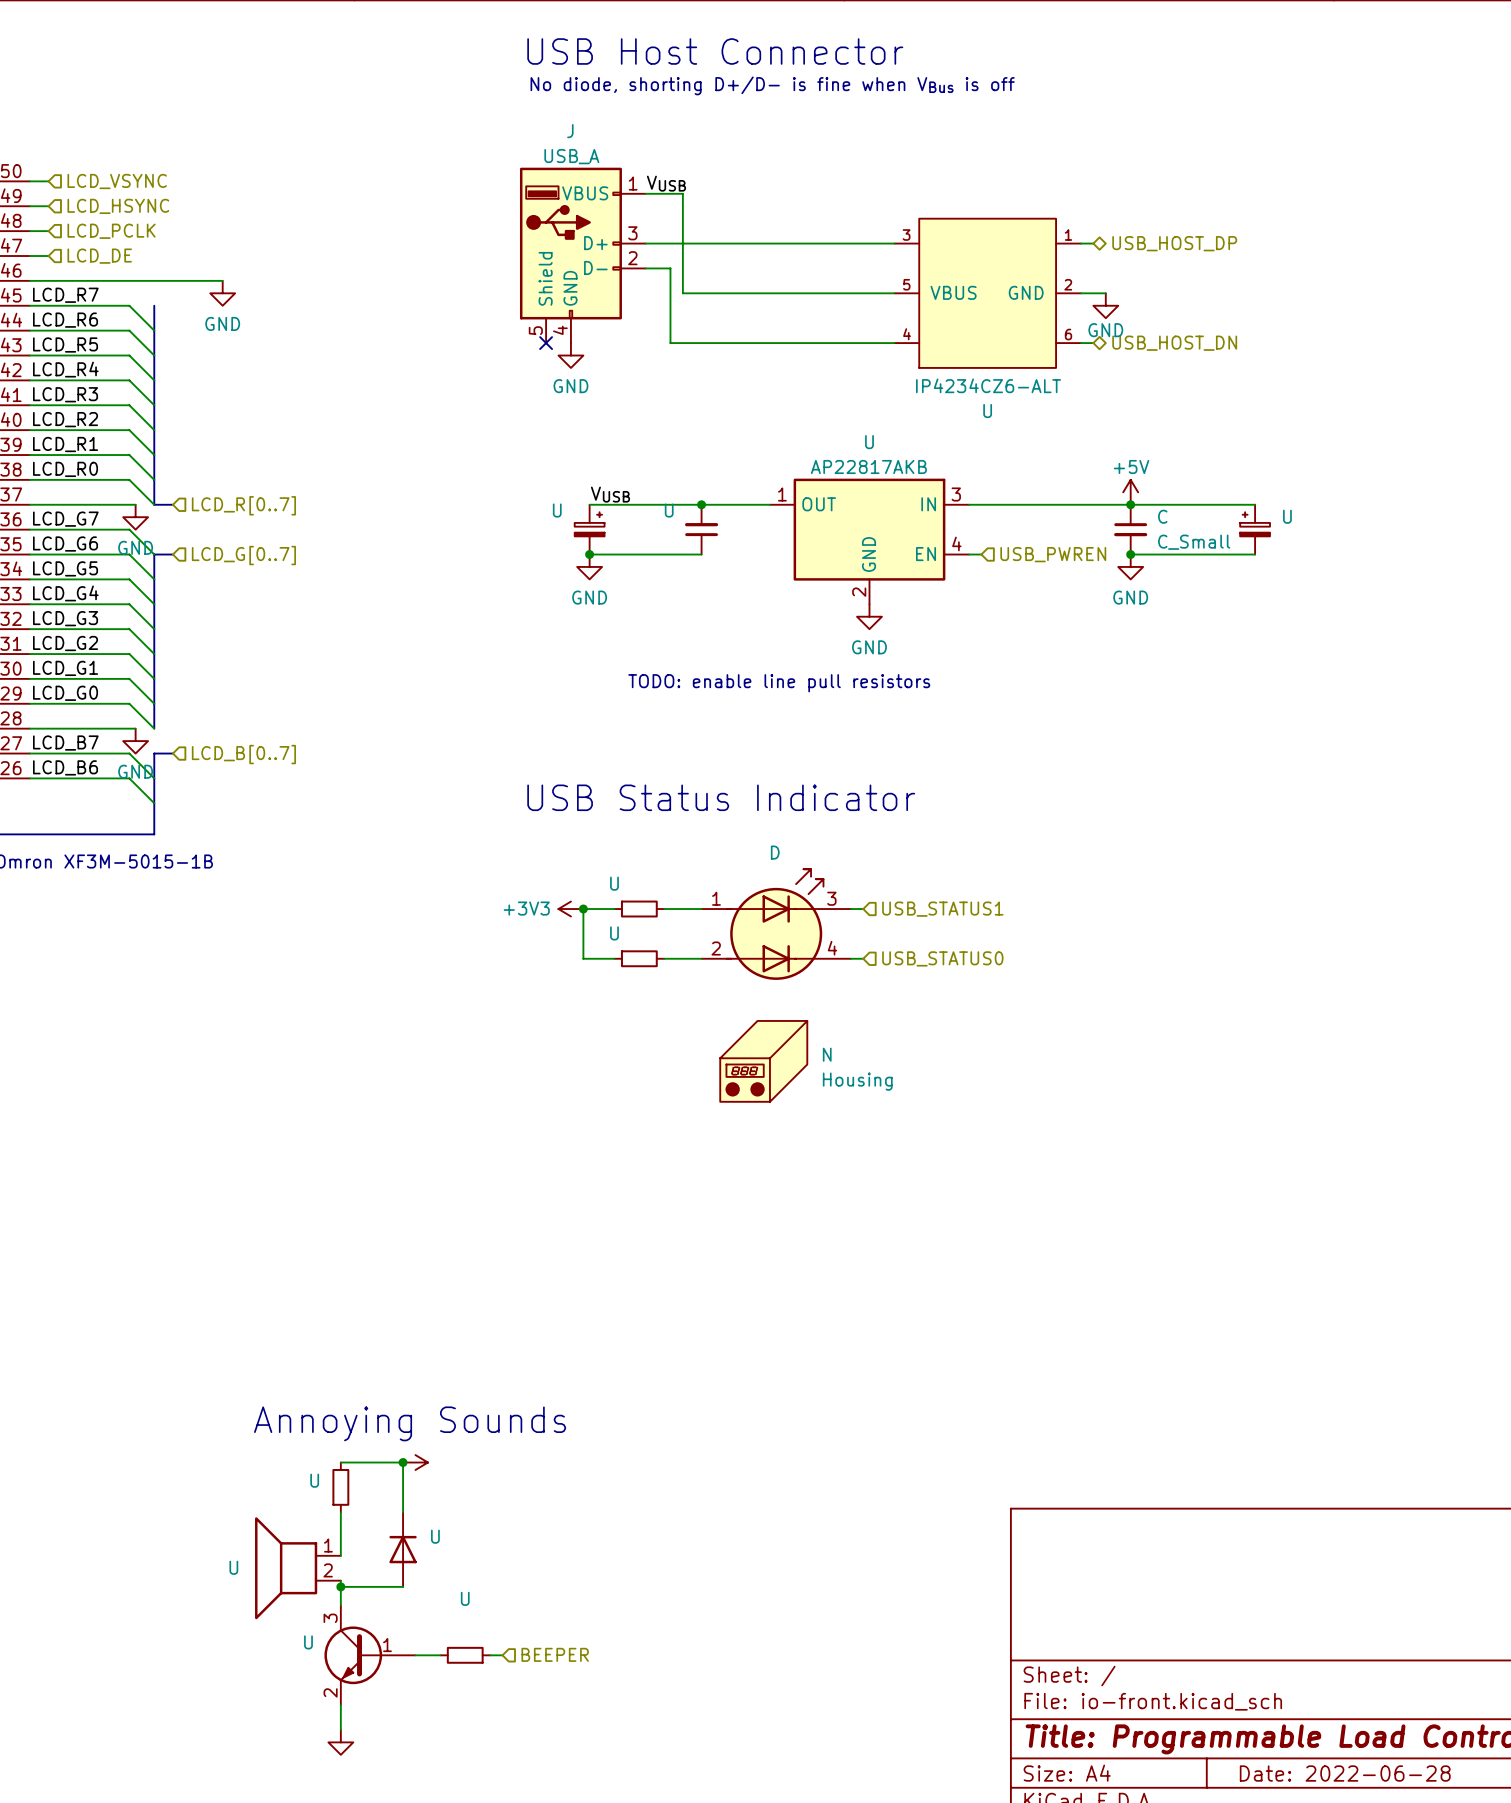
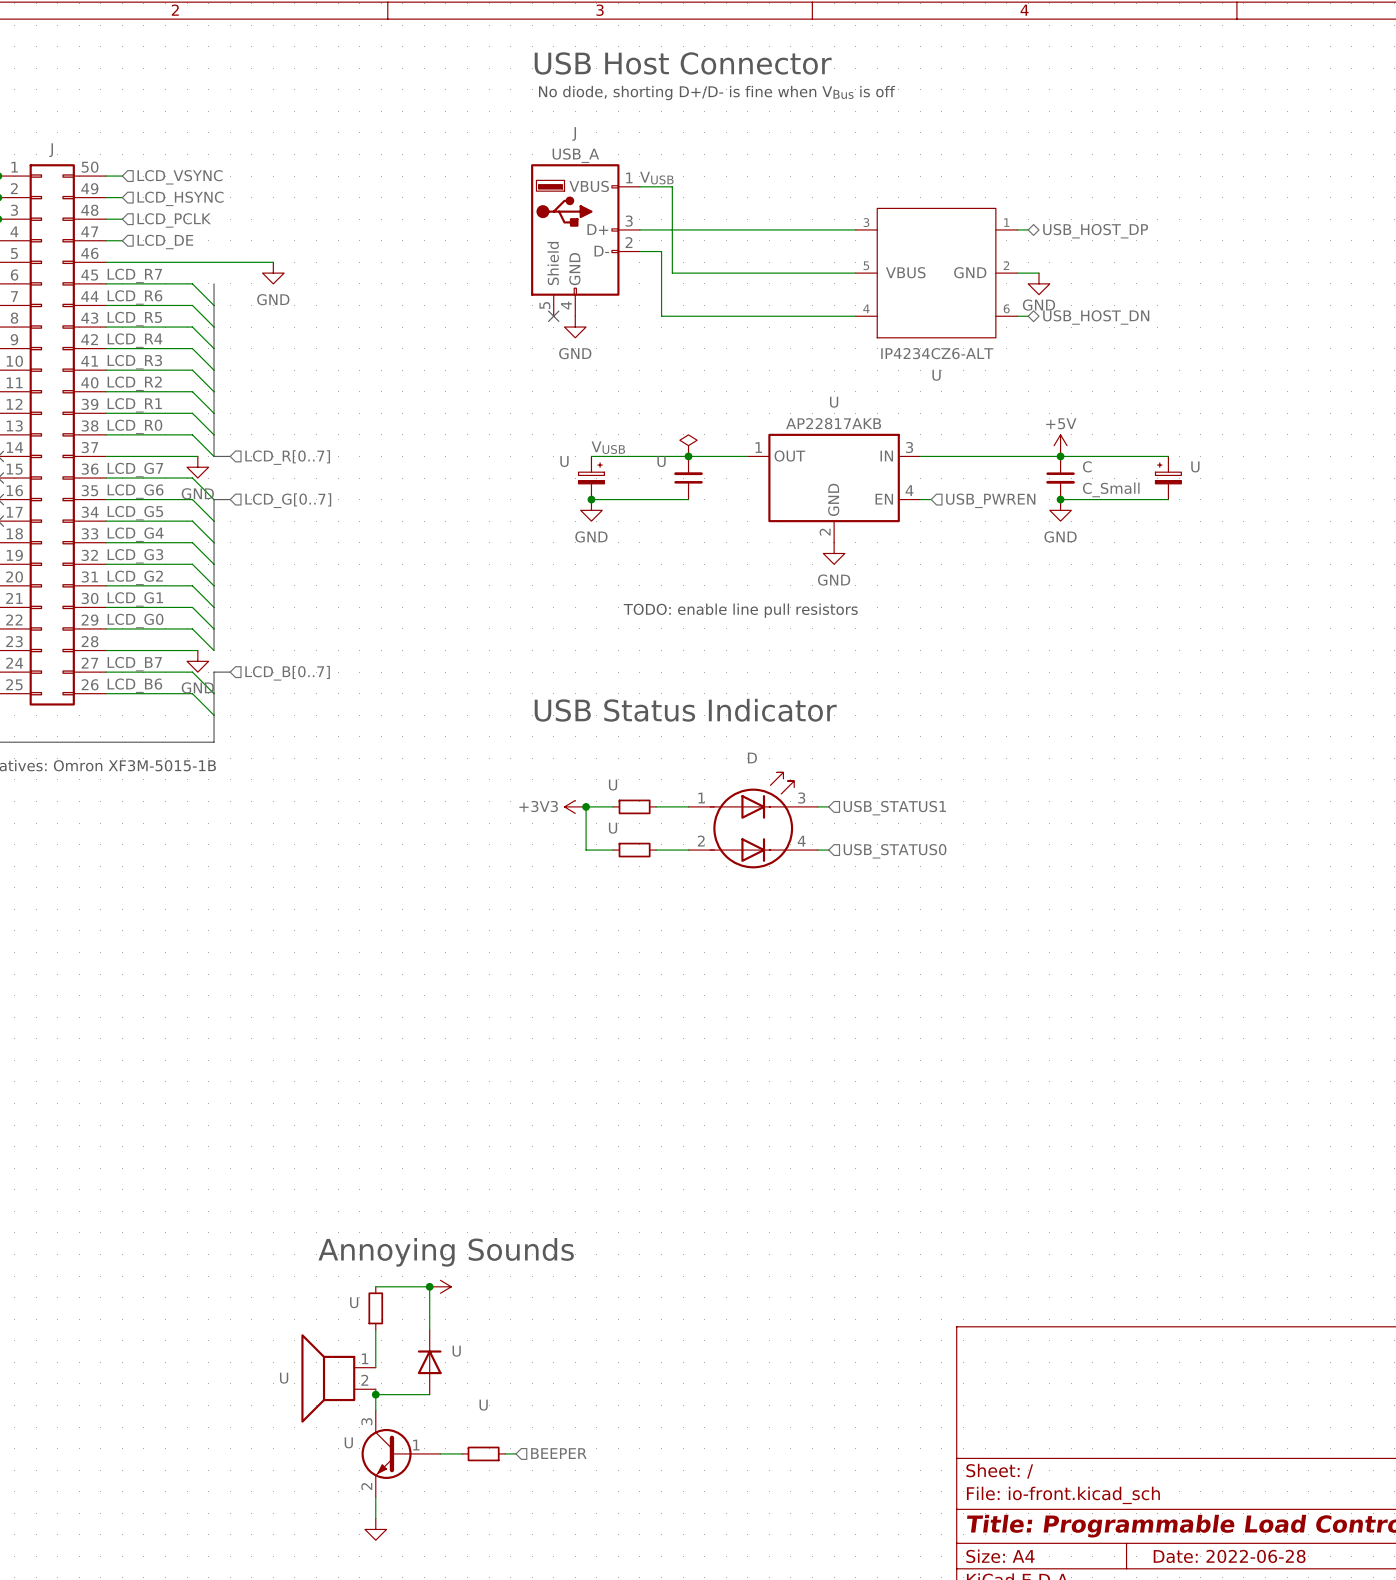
power symbol: none -> (688, 445)
N: Housing (763, 1061) -> none

